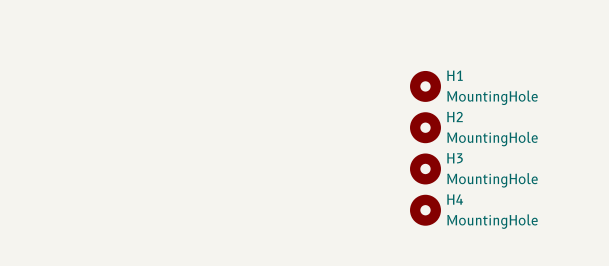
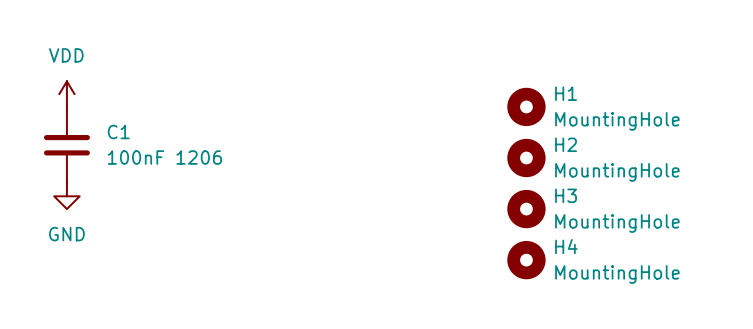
power symbol: none -> VDD (66, 94)
C1: none -> 100nF 1206 (66, 145)
power symbol: none -> GND (66, 196)

